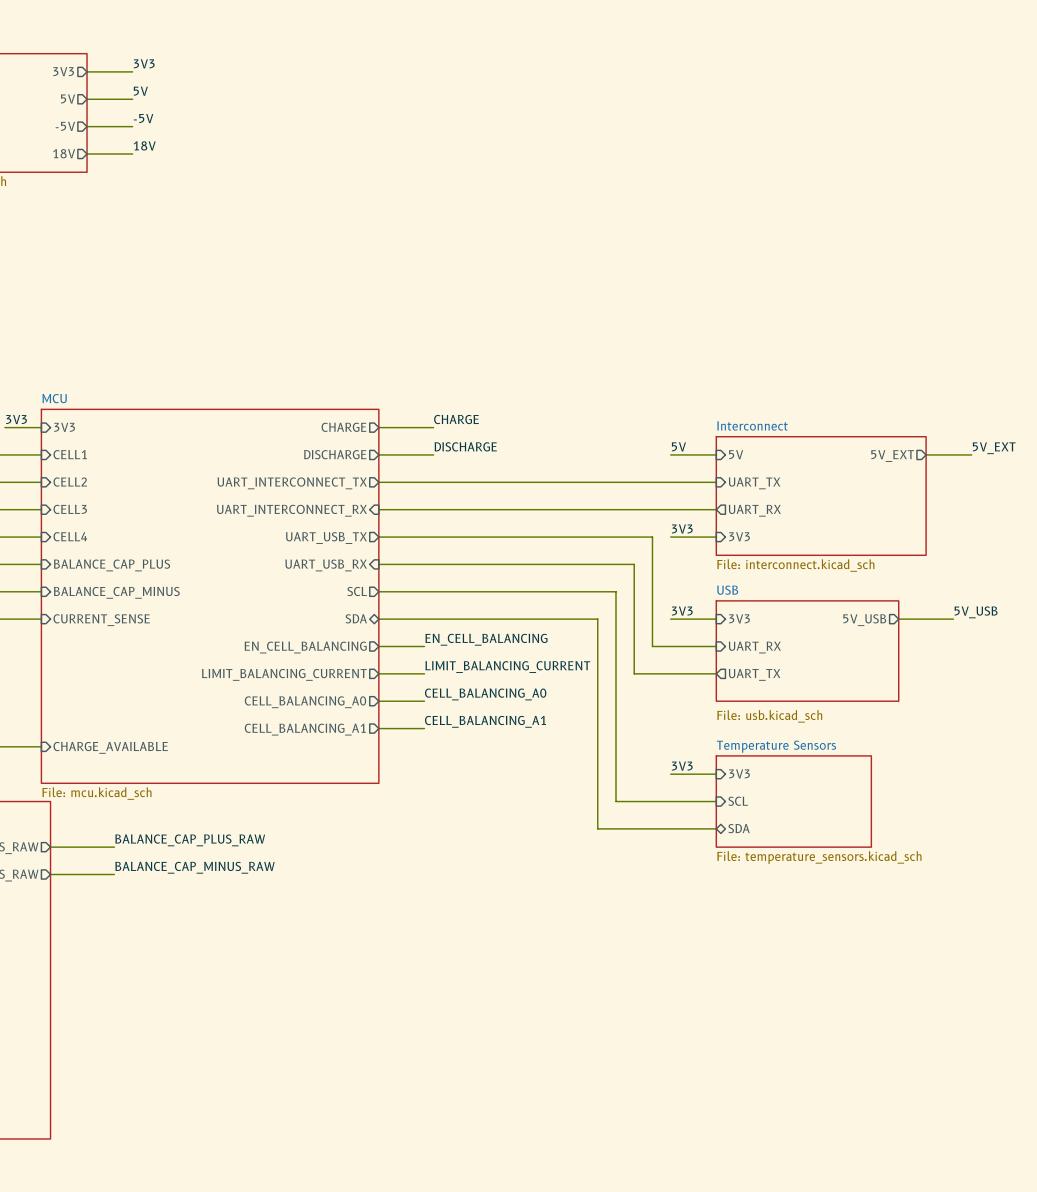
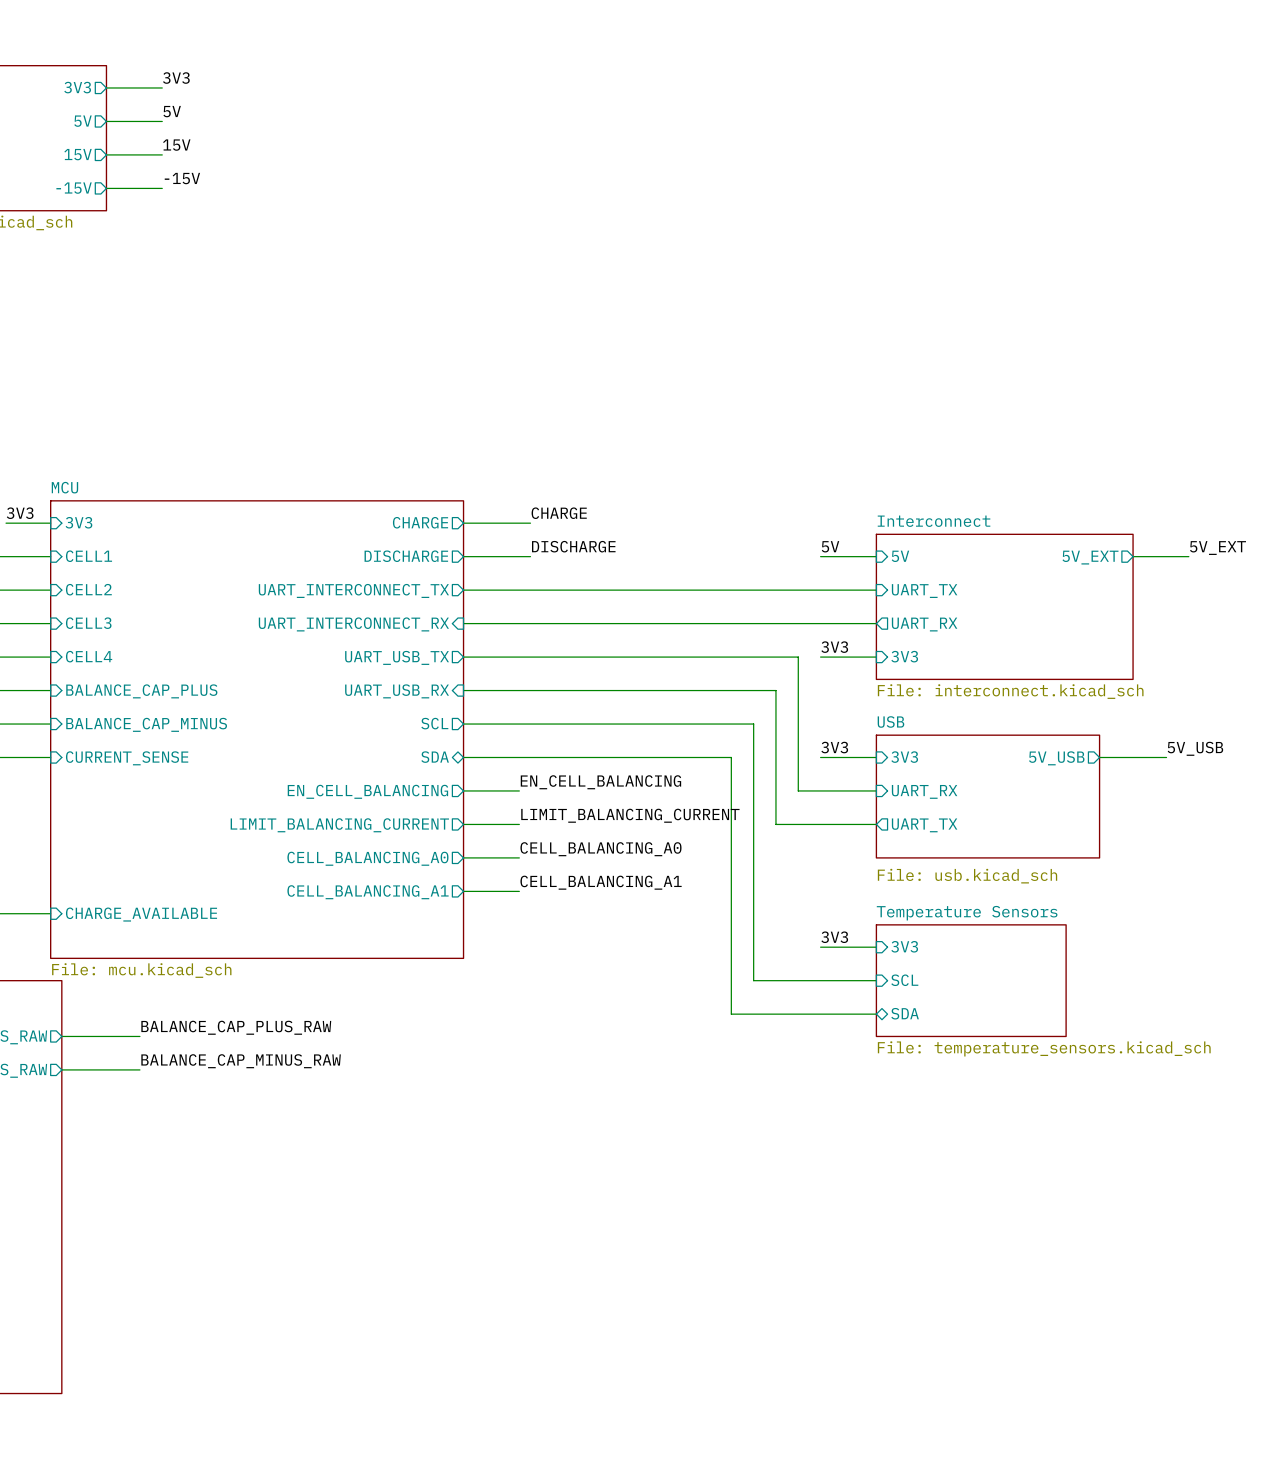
label: -5V (143, 118) -> 15V (176, 145)
sheet pin: -5V (65, 126) -> 15V (78, 154)
label: 18V (144, 145) -> -15V (182, 178)
sheet pin: 18V (64, 153) -> -15V (74, 188)

